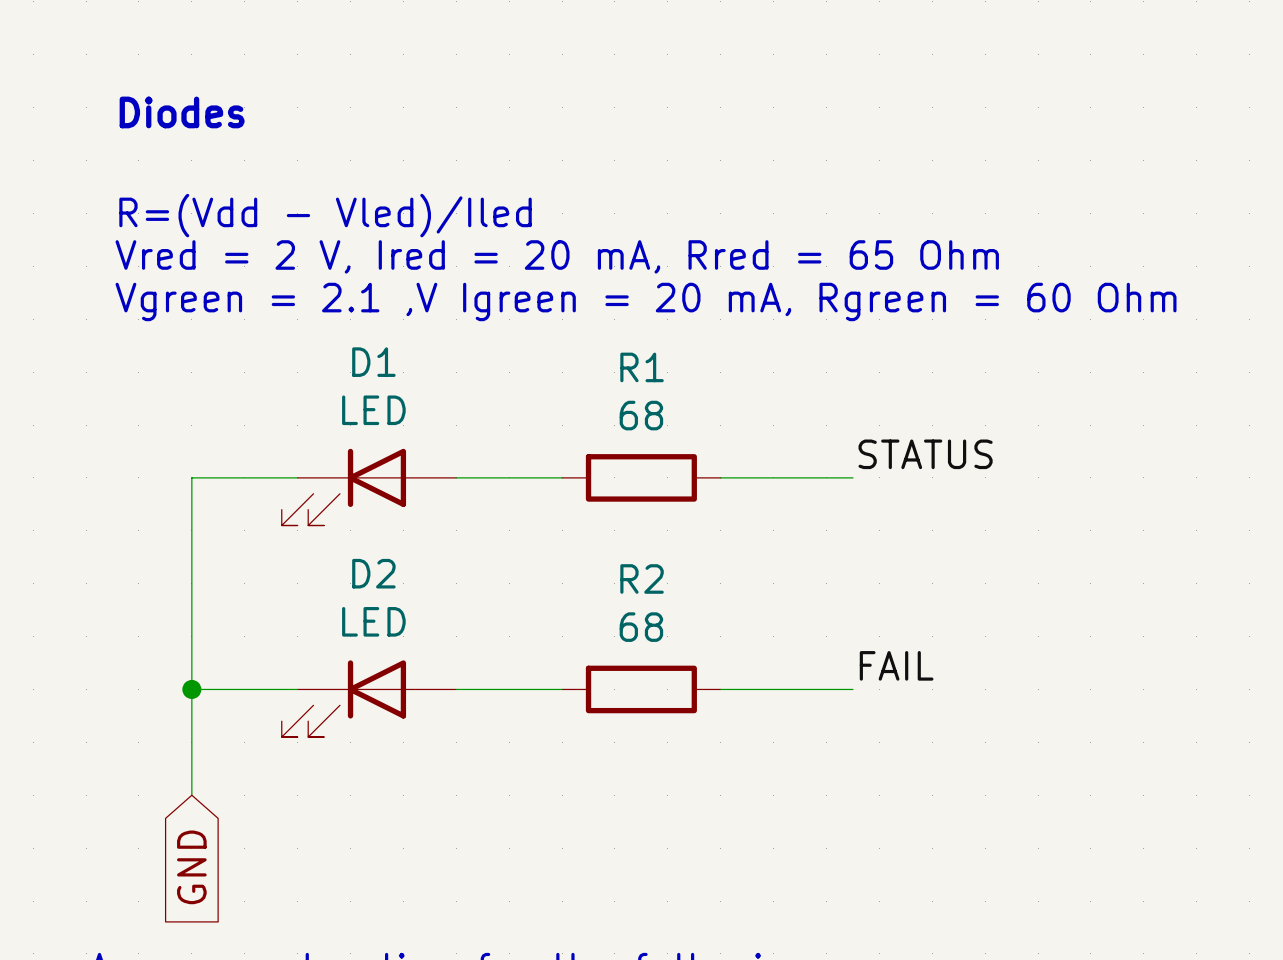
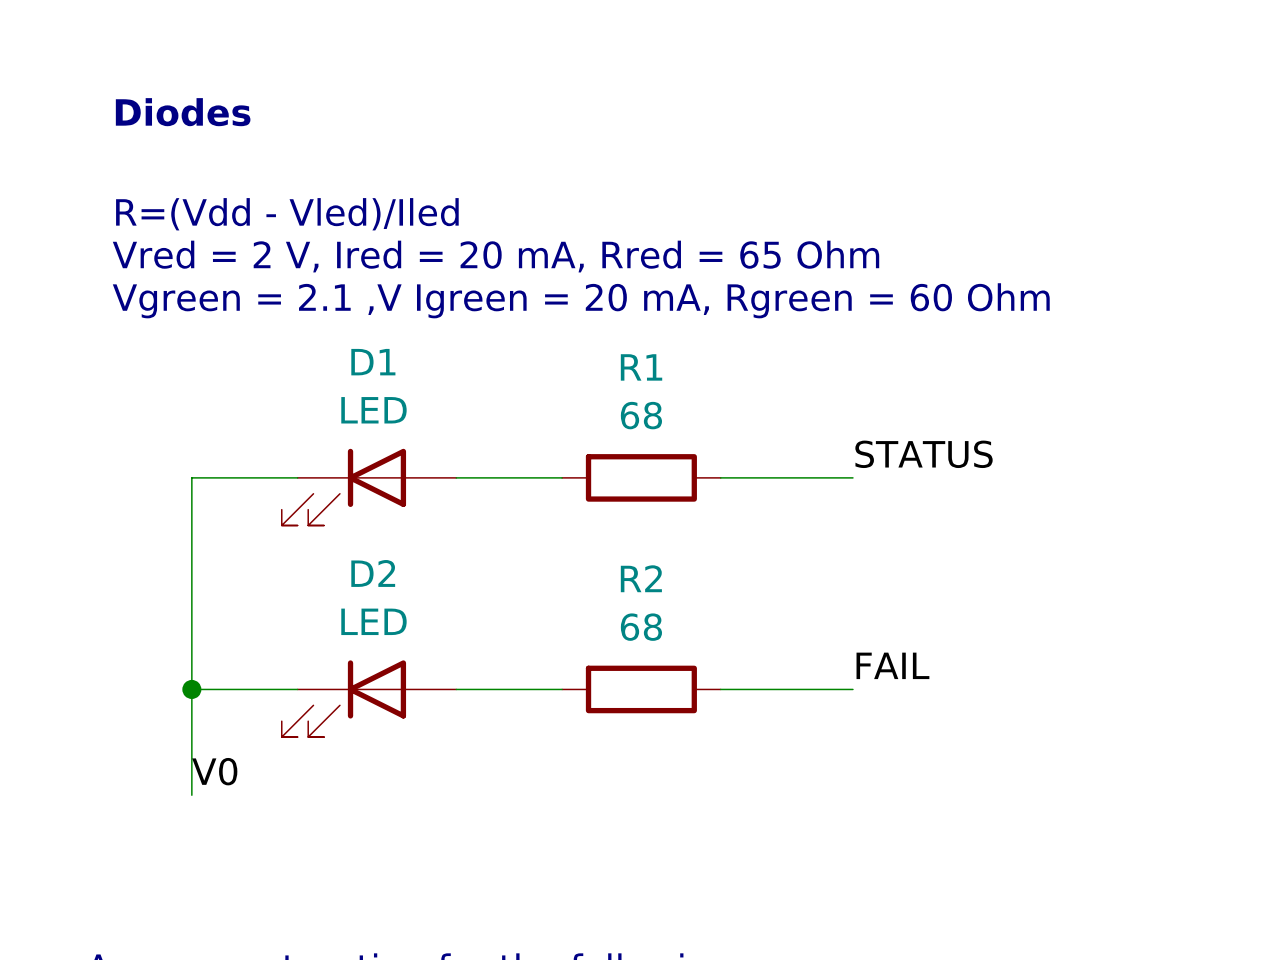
label: none -> V0 (214, 771)
global label: GND (191, 867) -> none

